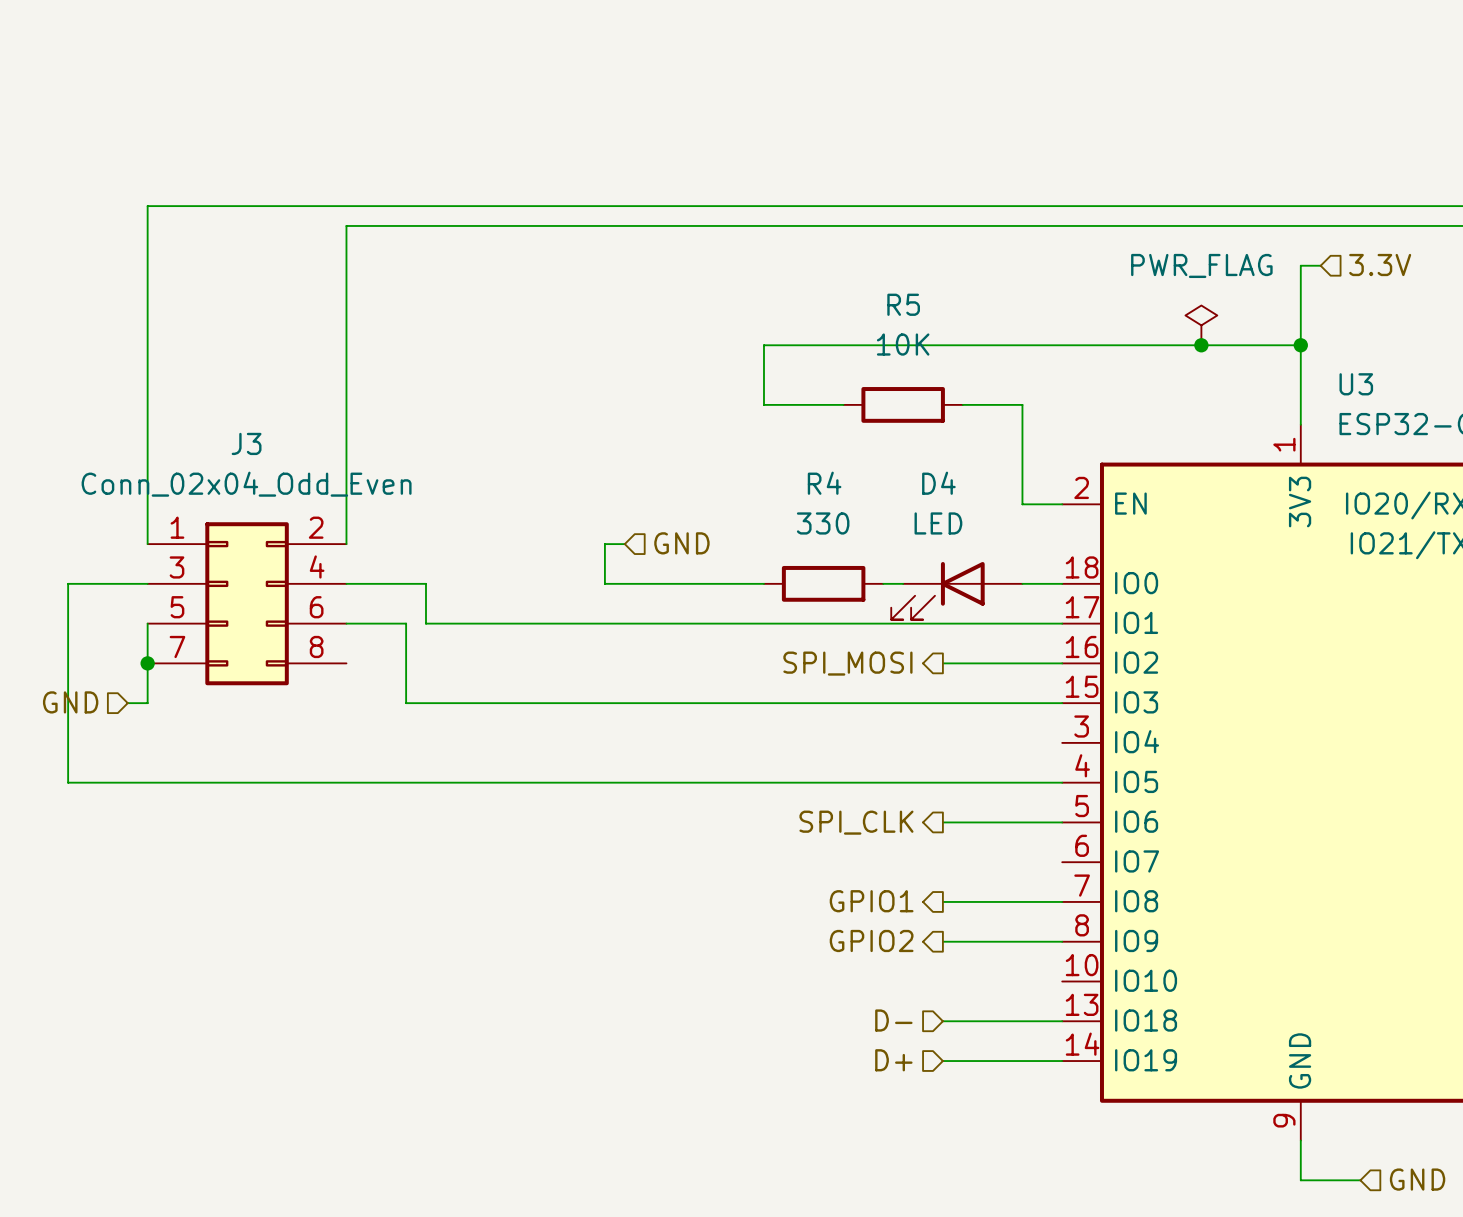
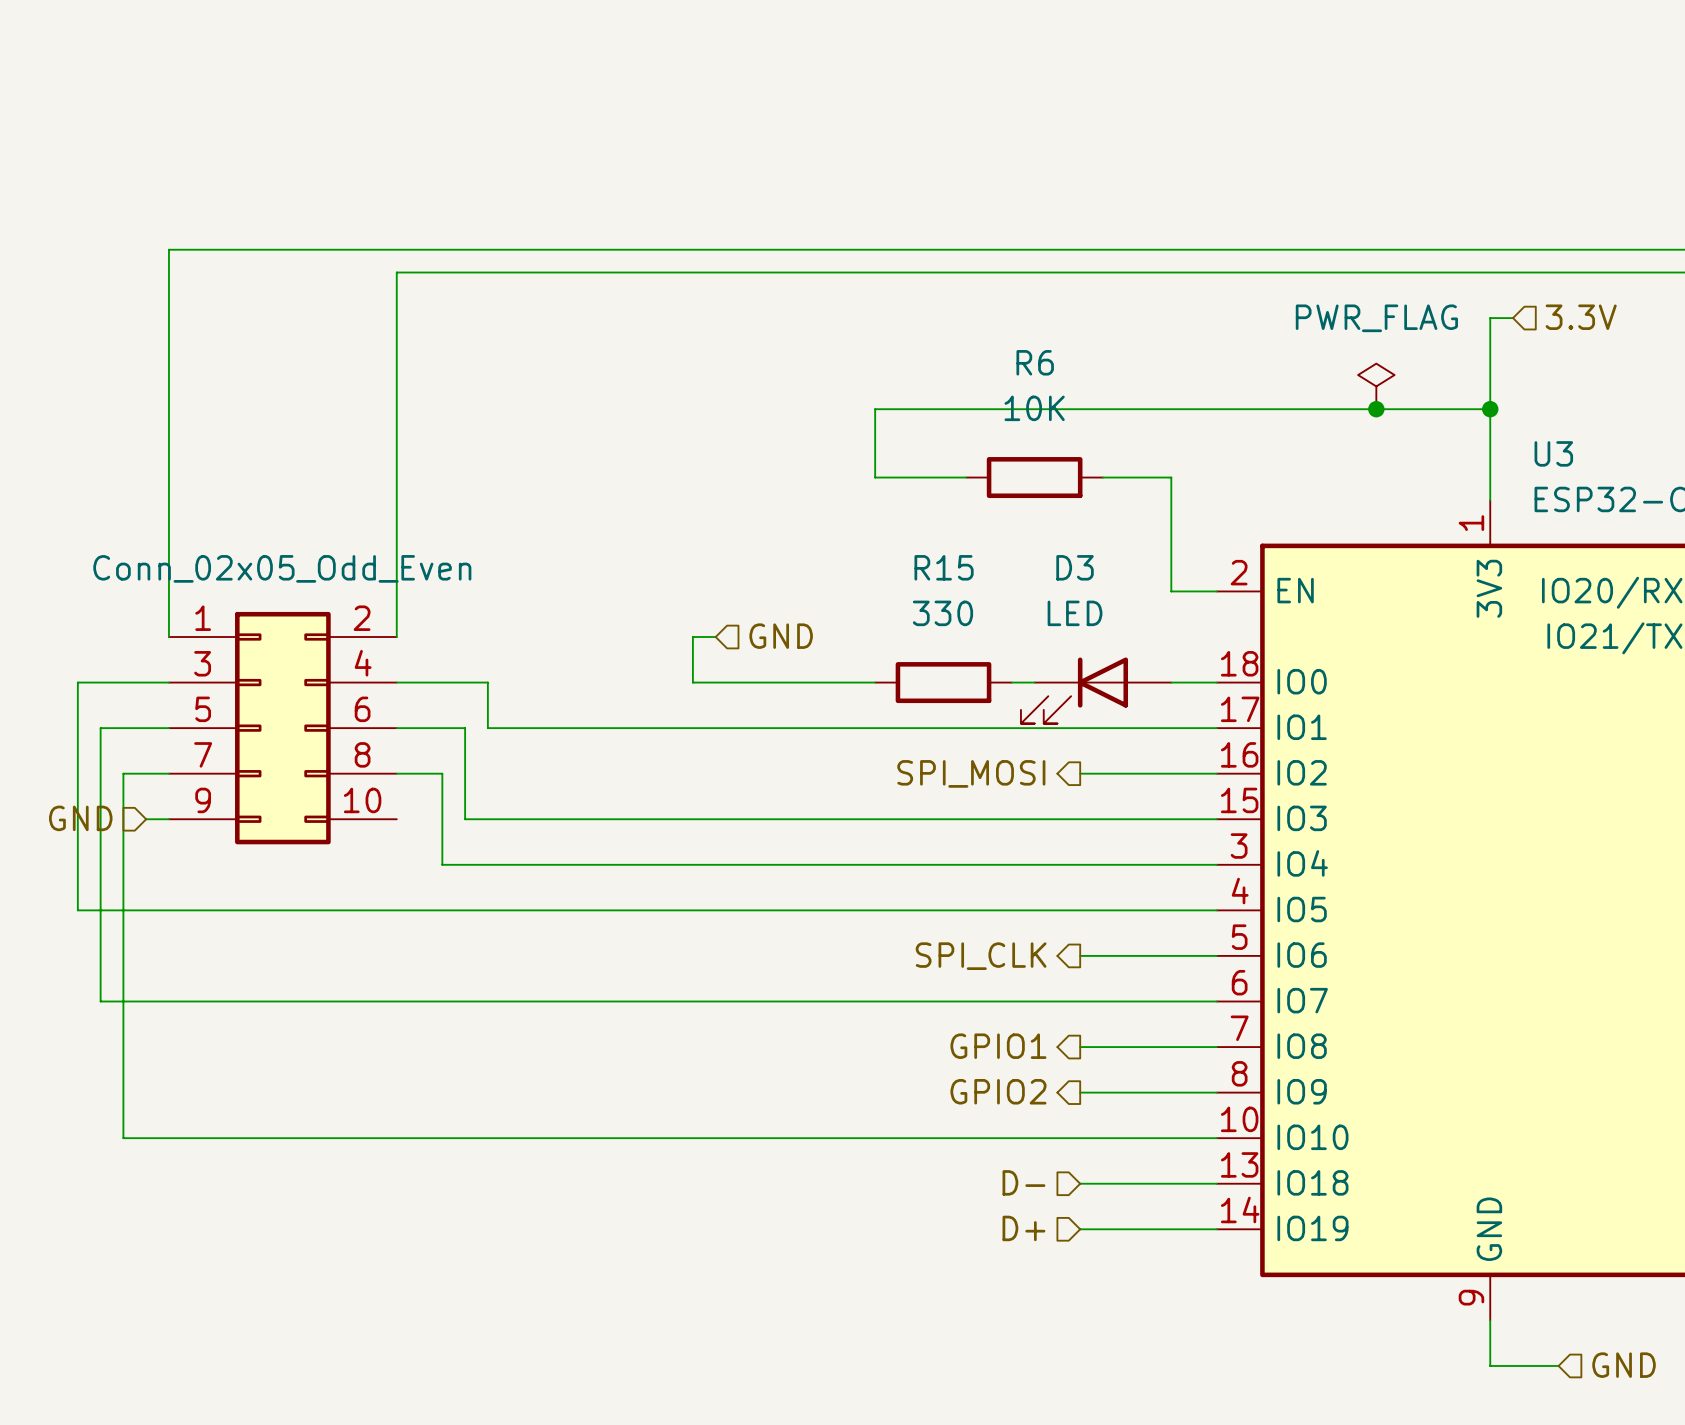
R5 name: R5 (903, 304) -> R6 (1035, 362)
R4 name: R4 (824, 483) -> R15 (944, 567)
D4 name: D4 (938, 483) -> D3 (1075, 567)
J3: Conn_02x04_Odd_Even (247, 603) -> none
wire: (147, 623) (147, 703) -> (168, 728) (100, 728) (100, 1001) (1216, 1001)
part: none -> Conn_02x05_Odd_Even (282, 728)
wire: none -> (168, 773) (123, 773) (123, 1138) (1216, 1138)
junction: (147, 663) -> none
wire: none -> (396, 773) (442, 773) (442, 864) (1216, 864)

